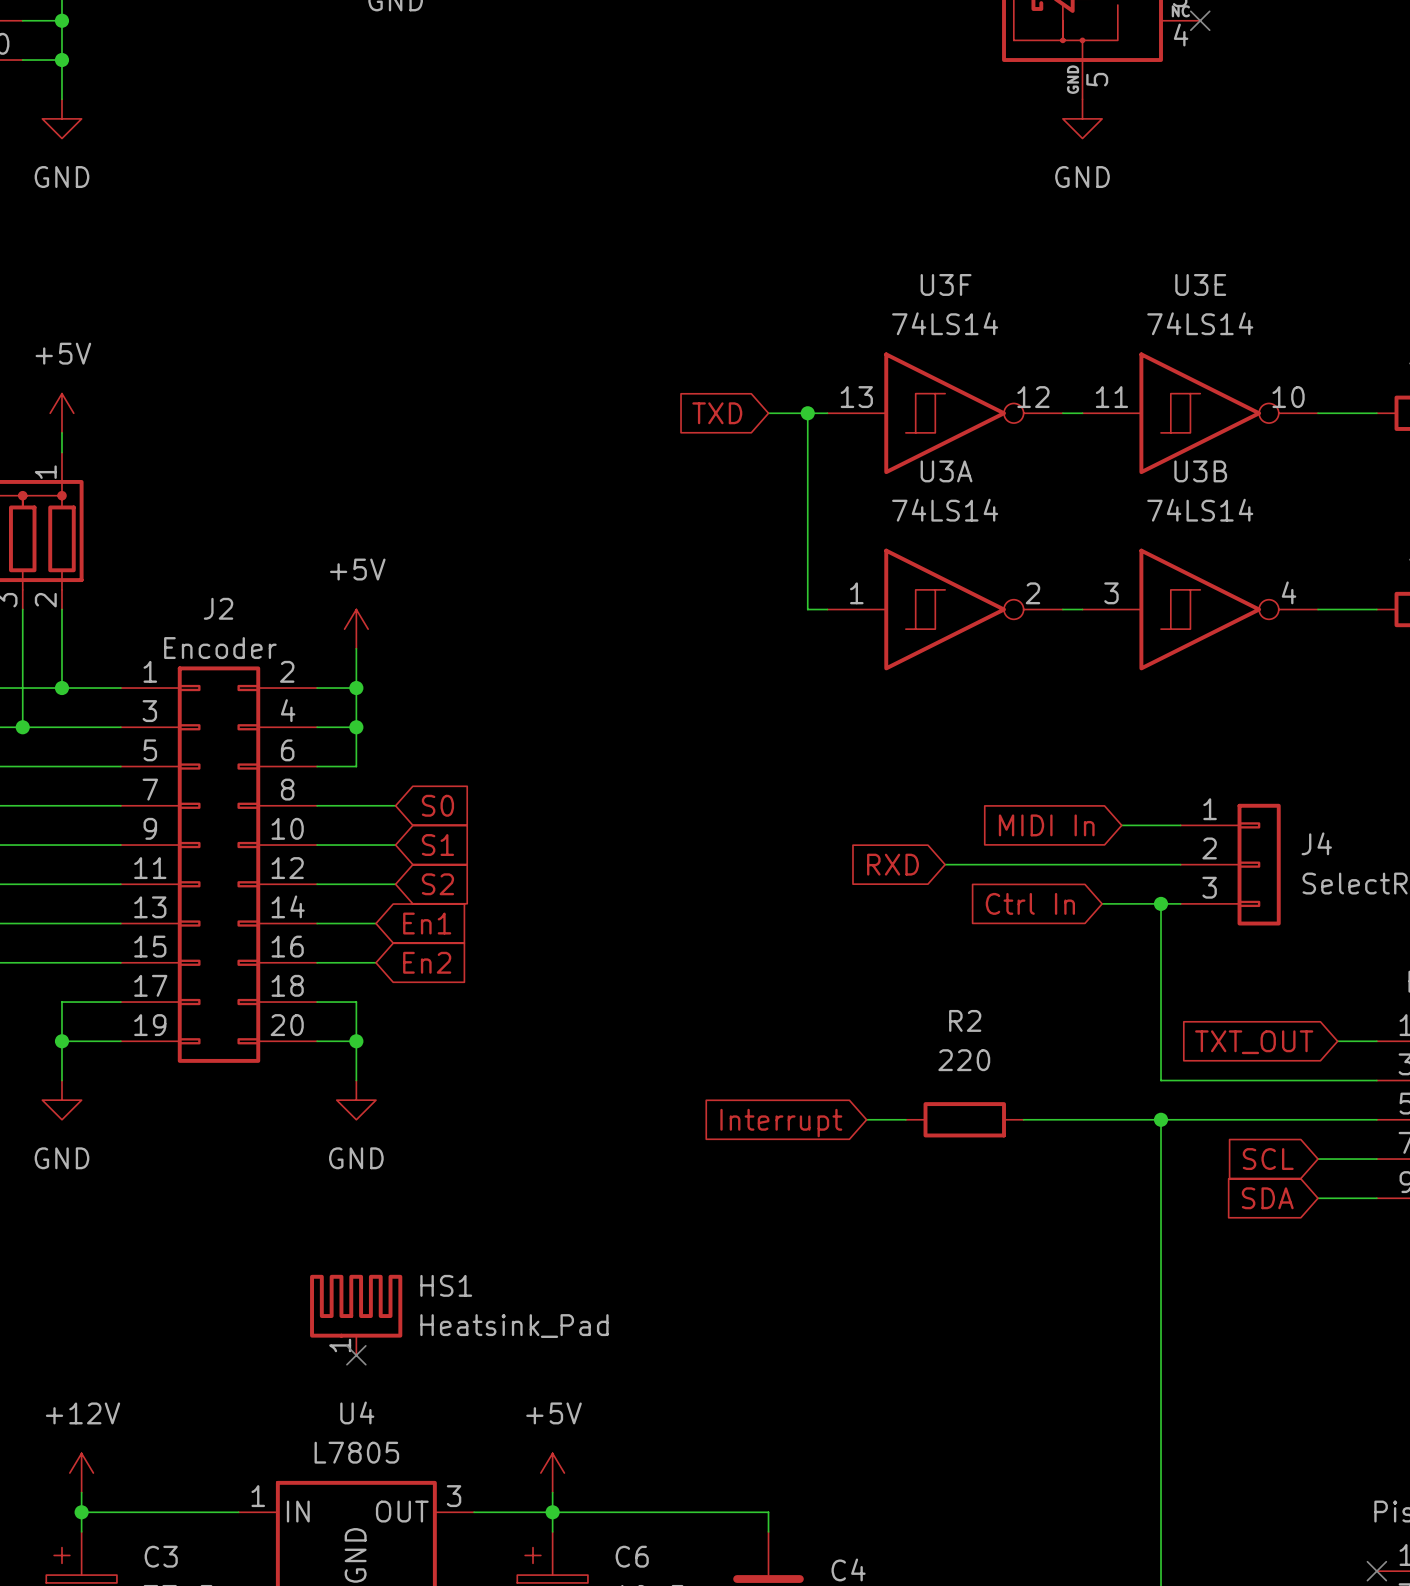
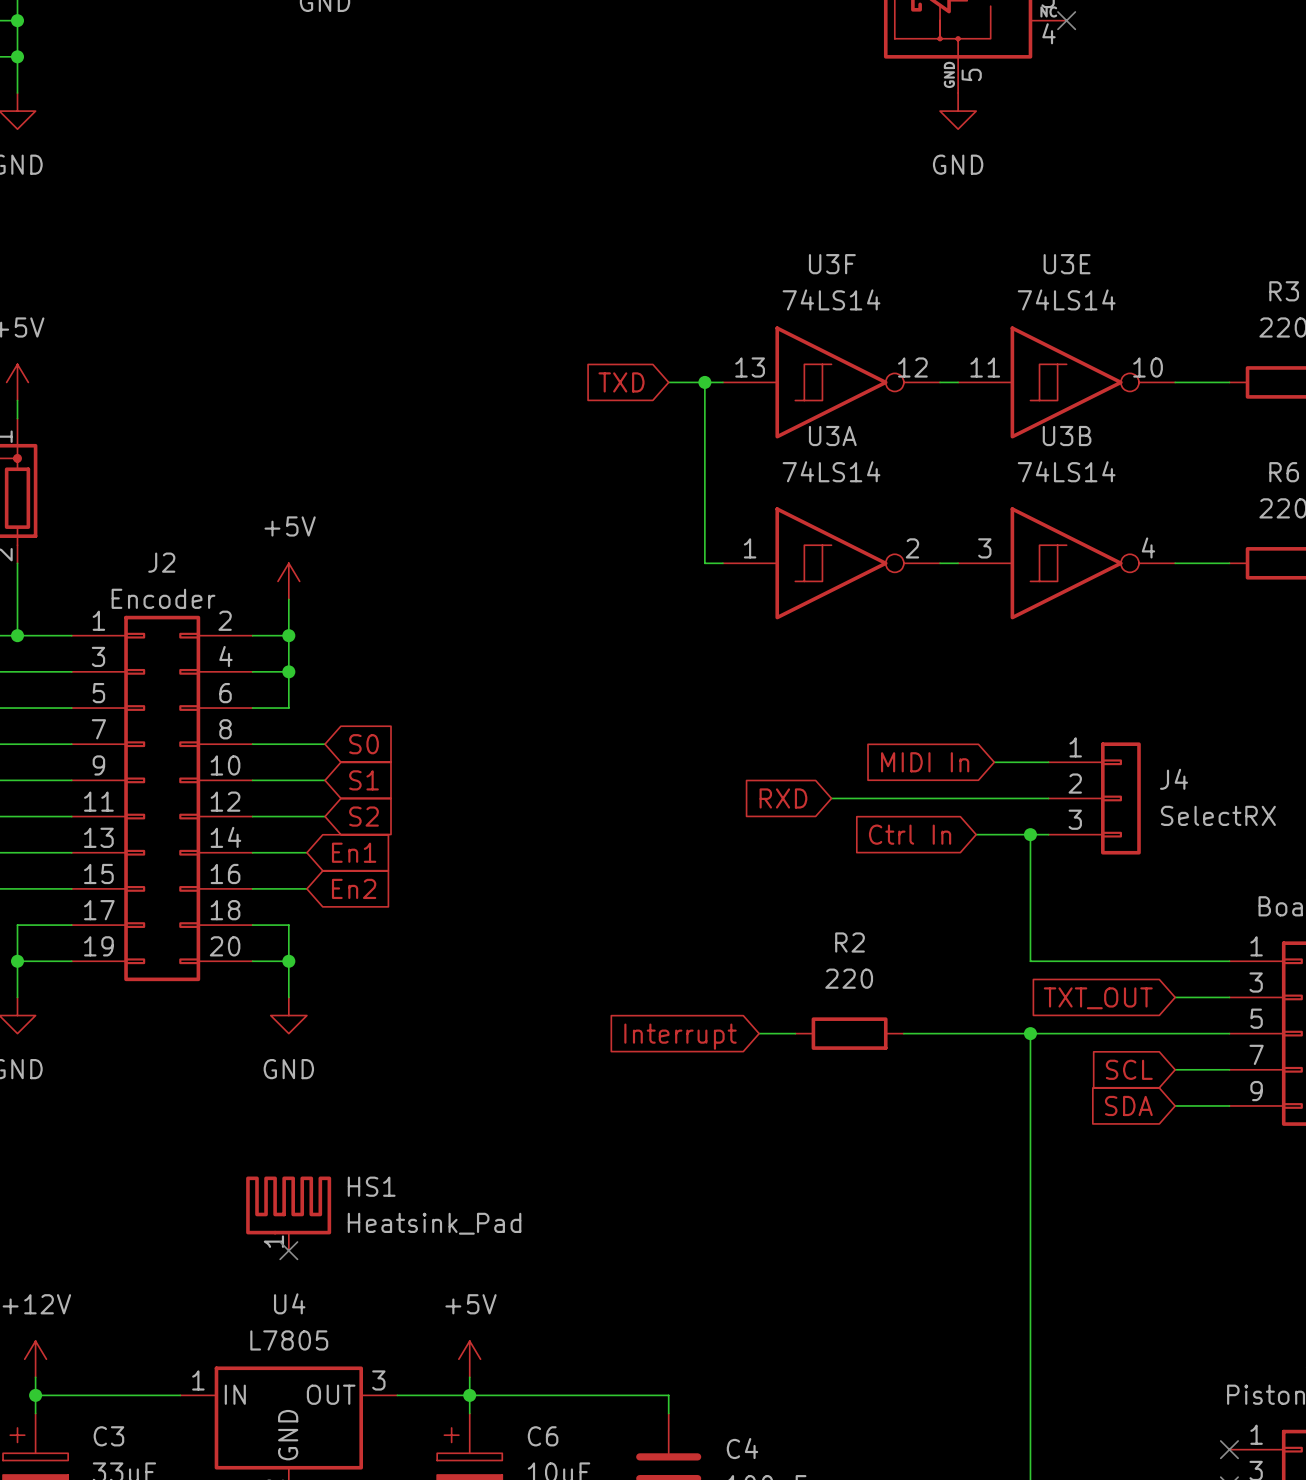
wire: (1161, 1041) (1161, 1080) (1318, 1080) -> (1030, 961) (1193, 961)
global label position: TXT_OUT (1254, 1042) -> TXT_OUT (1098, 998)

